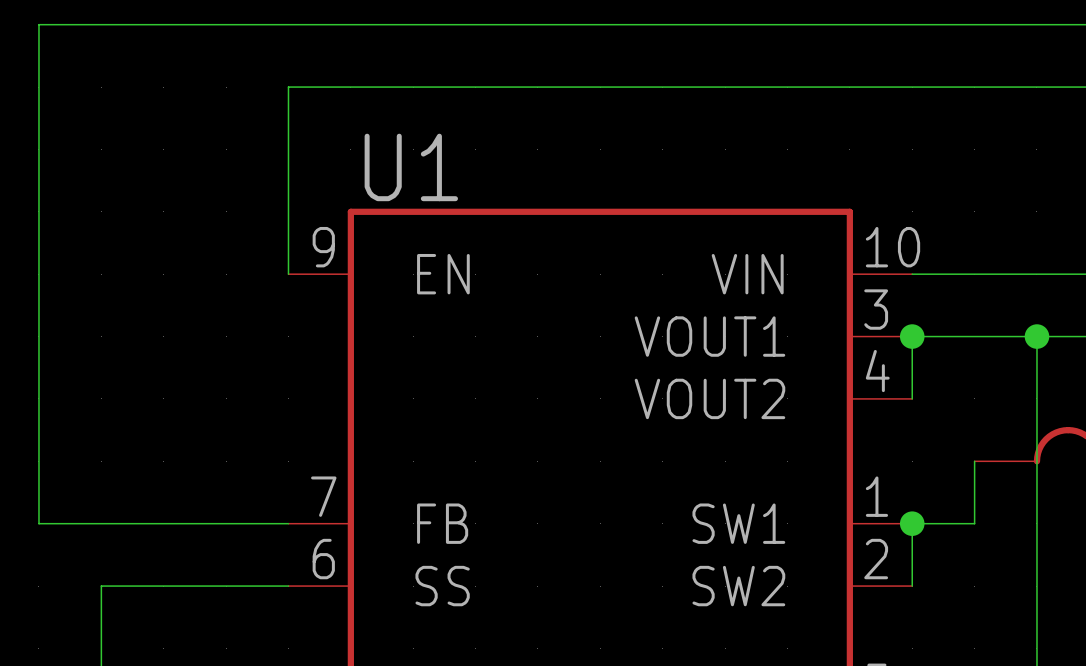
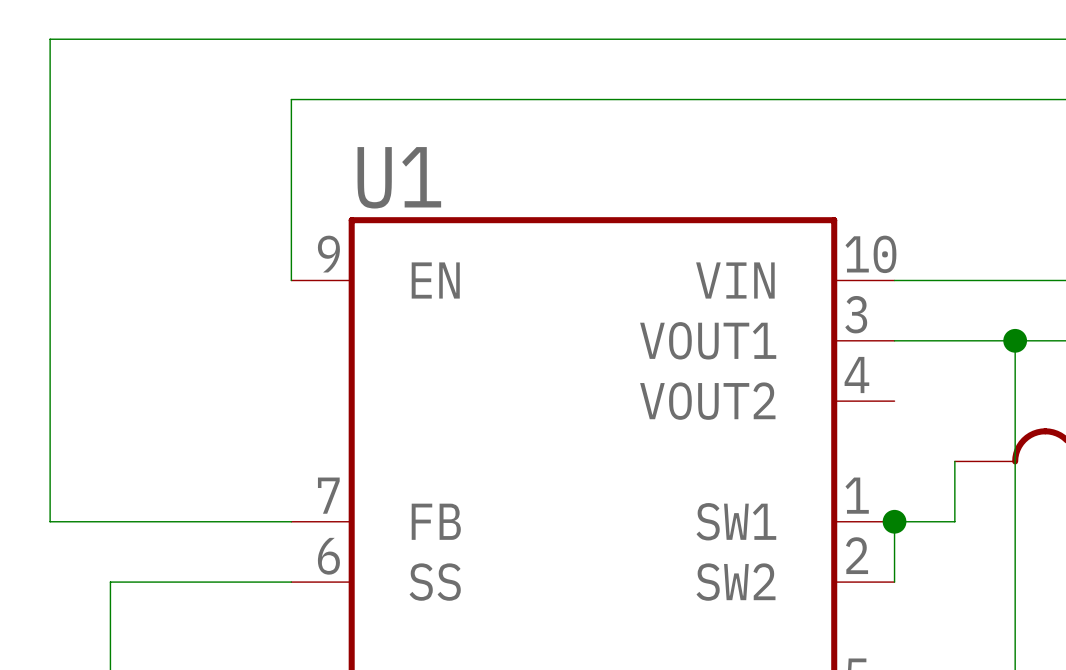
wire: (912, 336) (912, 398) -> none
junction: (912, 336) -> none

